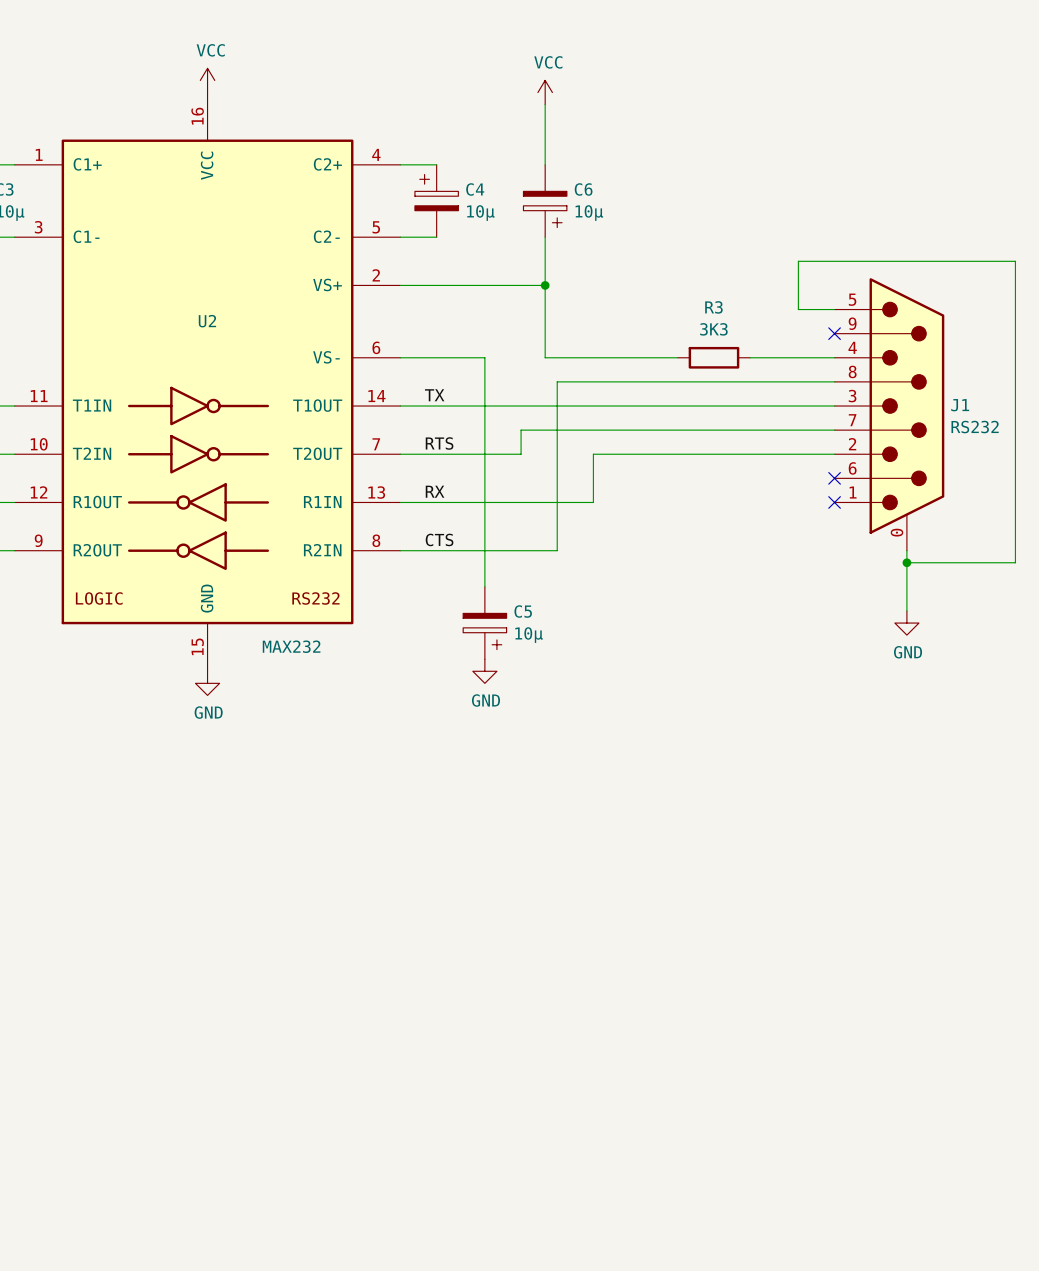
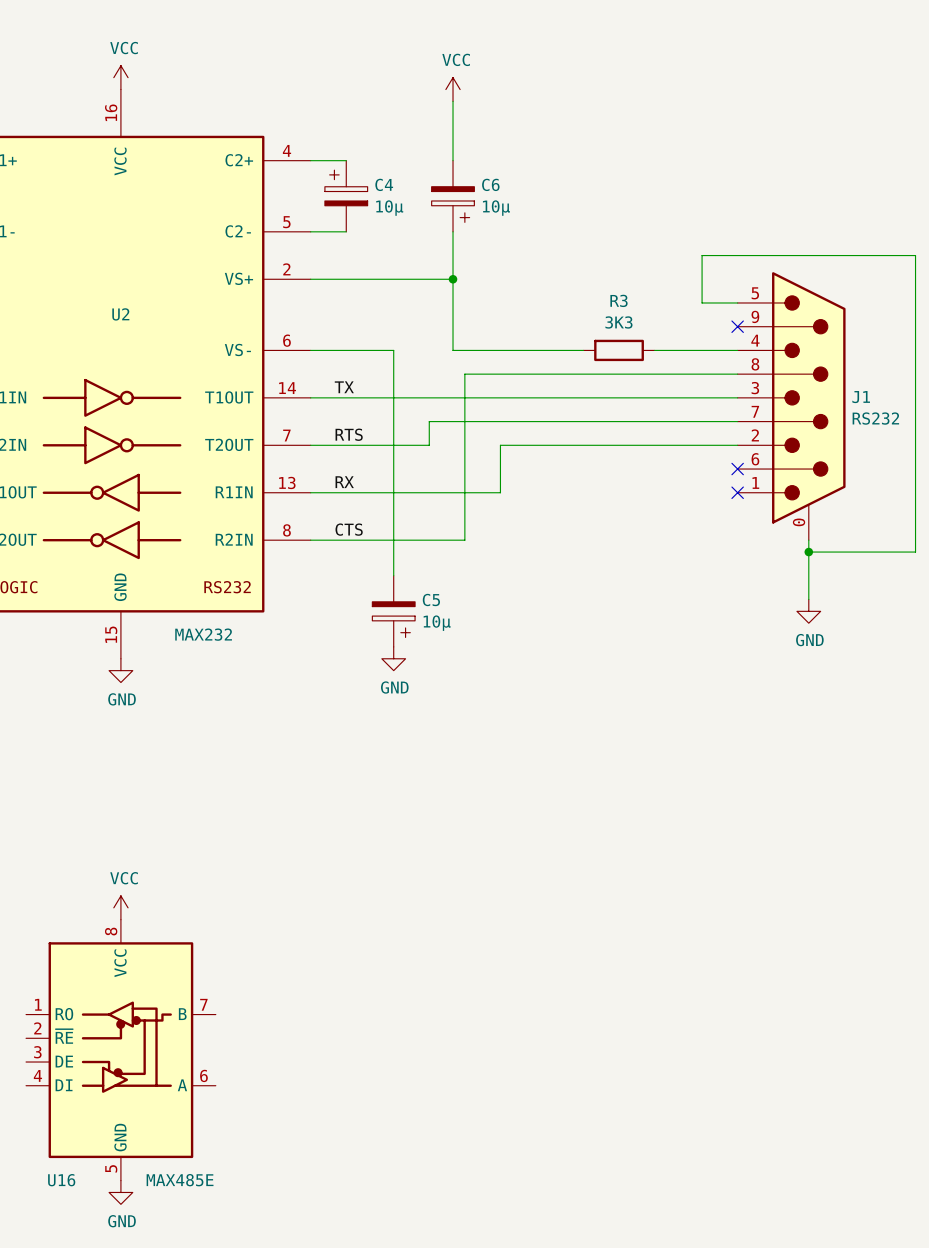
power symbol: none -> VCC (120, 907)
U16: none -> MAX485E (120, 1050)
power symbol: none -> GND (120, 1192)

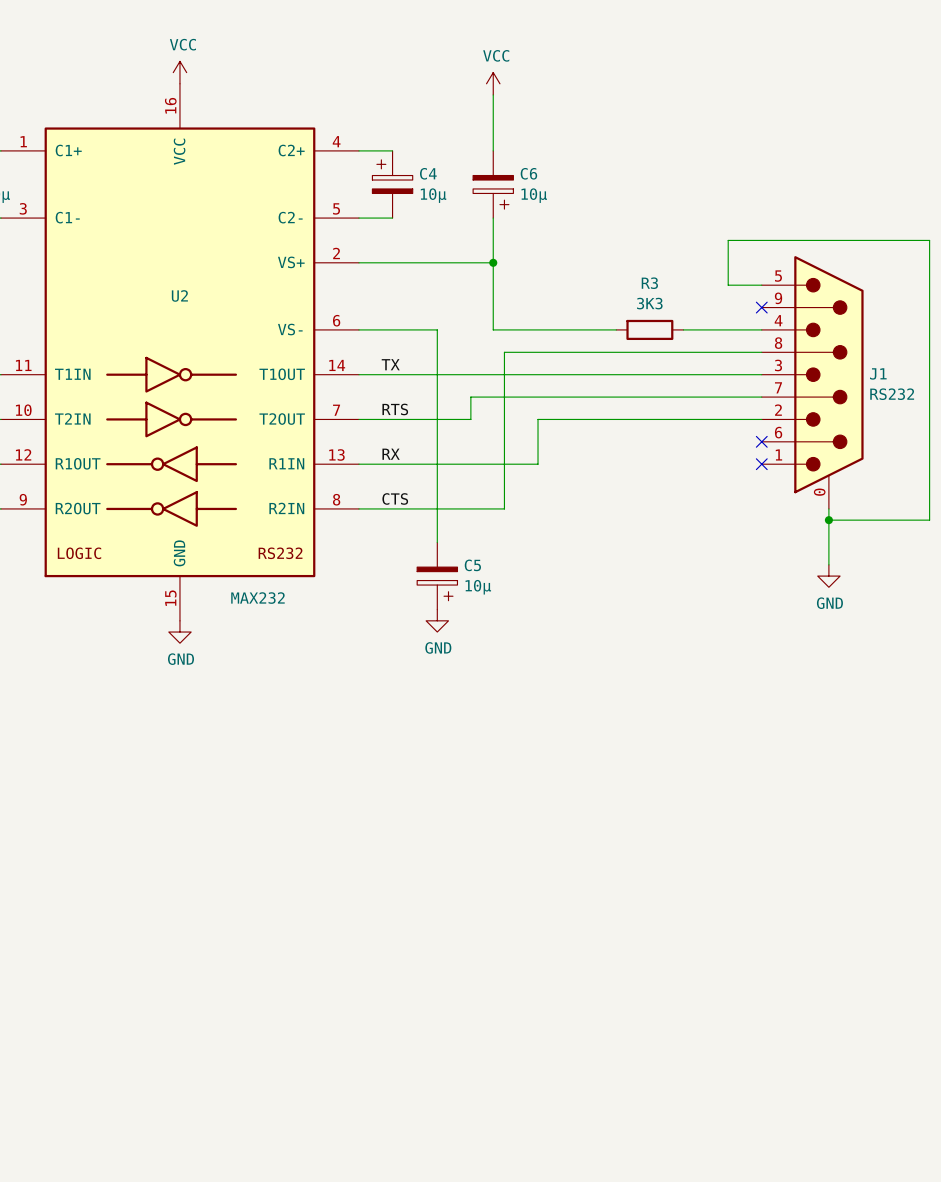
power symbol: VCC (120, 907) -> none
U16: MAX485E (120, 1050) -> none
power symbol: GND (120, 1192) -> none

